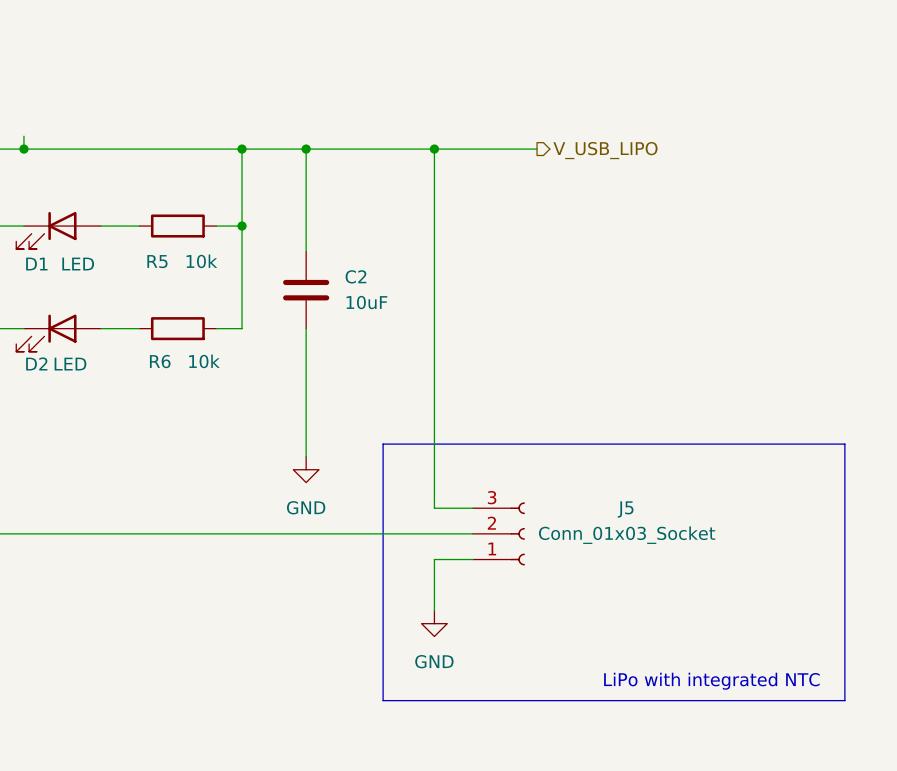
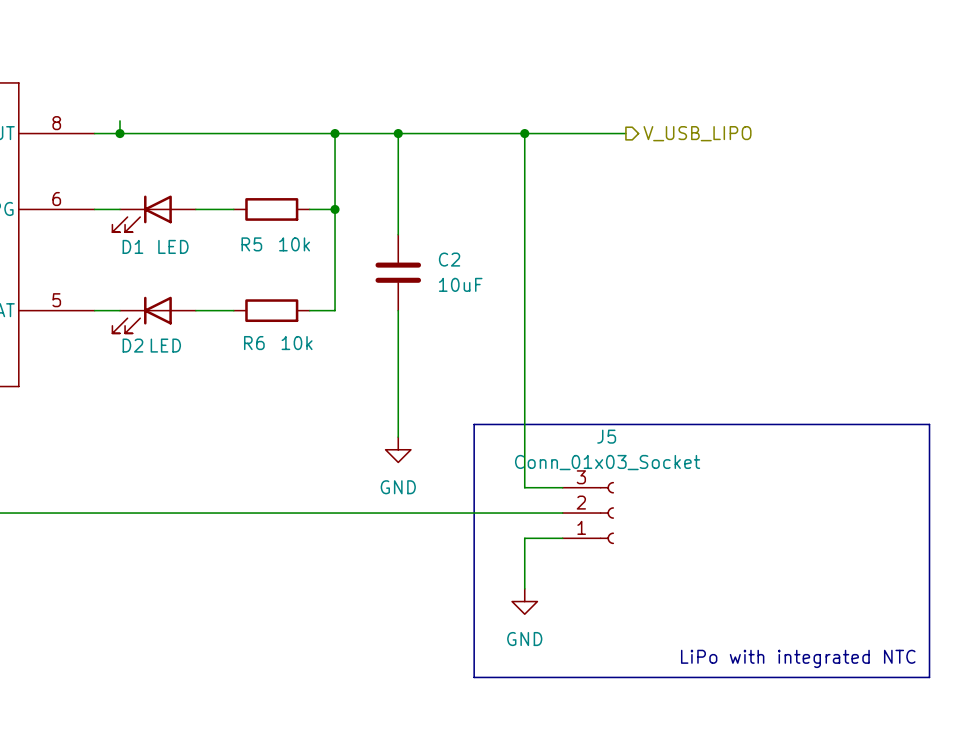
J5 name position: J5 (625, 509) -> J5 (606, 436)
J5 value position: Conn_01x03_Socket (627, 535) -> Conn_01x03_Socket (607, 462)

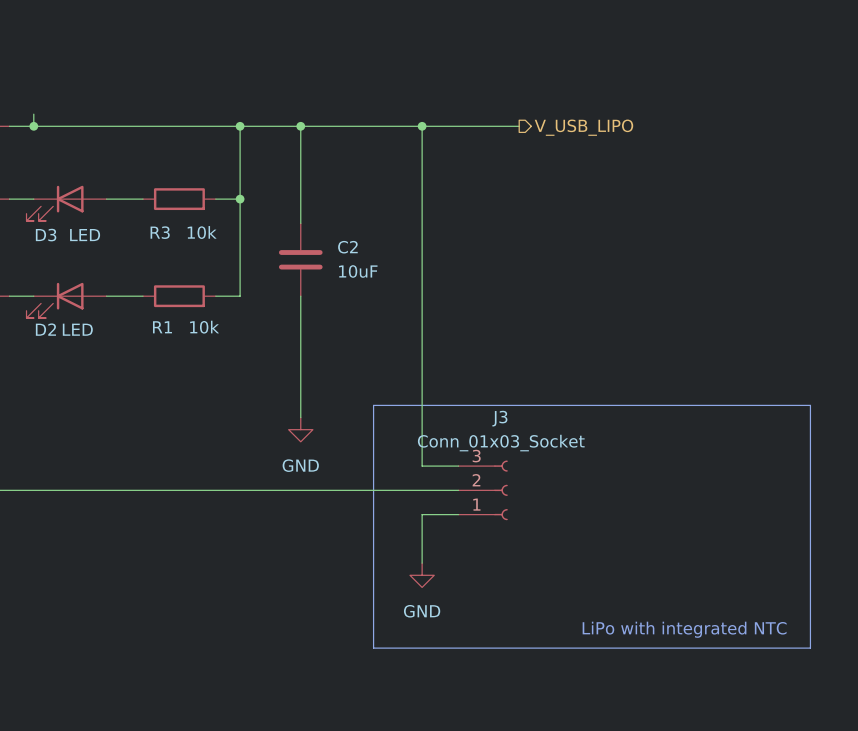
R5 name: R5 (251, 244) -> R3 (160, 232)
D1 name: D1 (132, 246) -> D3 (46, 235)
R6 name: R6 (254, 343) -> R1 (162, 327)
J5 name: J5 (606, 436) -> J3 (499, 418)

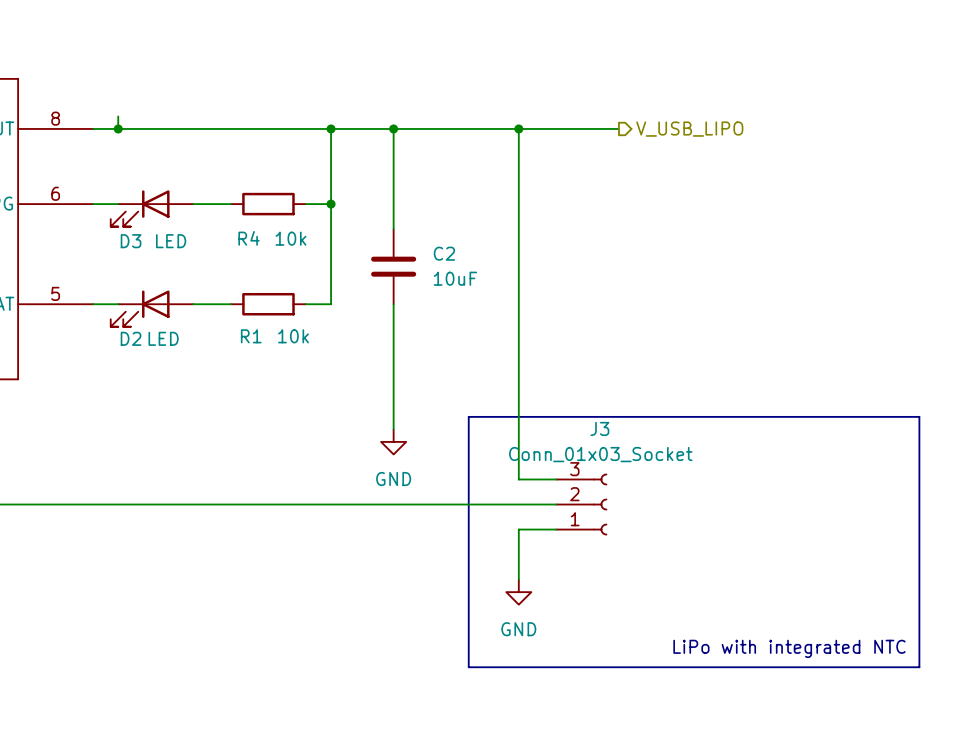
R3 name: R3 (160, 232) -> R4 (249, 238)

